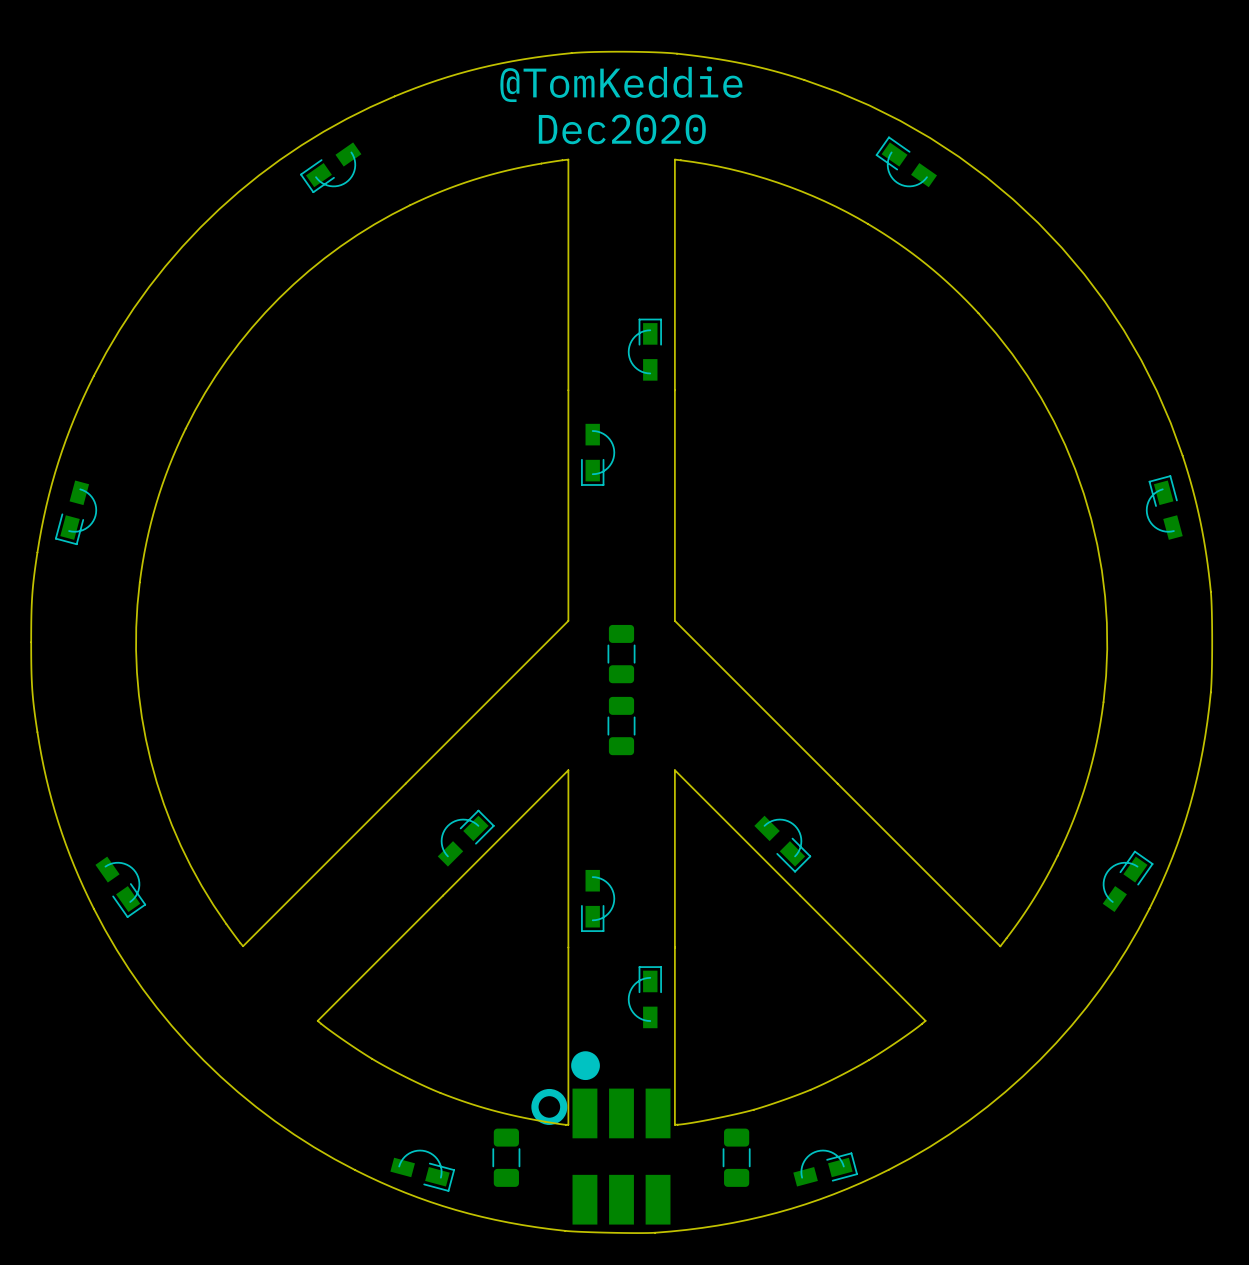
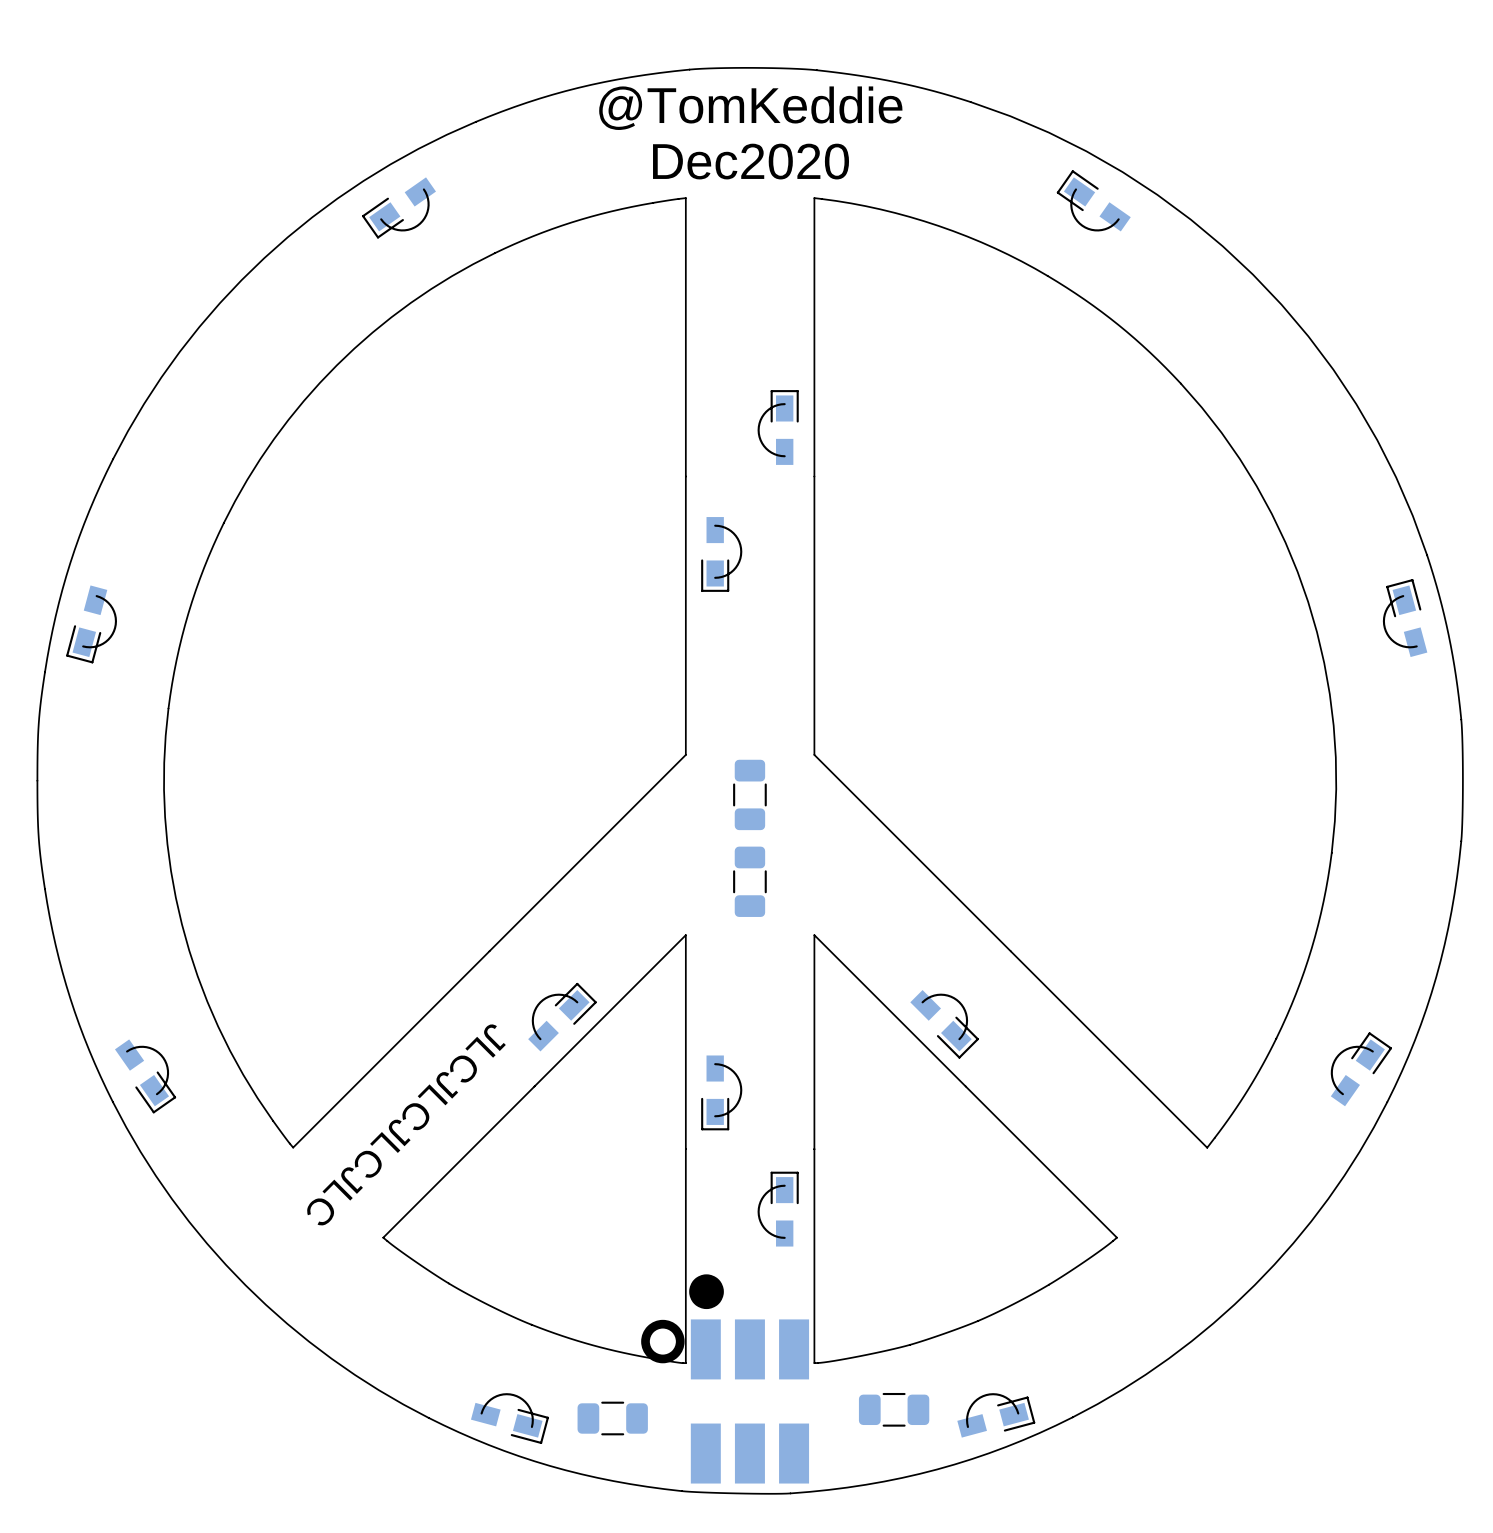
text: none -> JLCJLCJLCJLC (406, 1124)
part rotation: 0° (506, 1157) -> 90° clockwise (612, 1418)
part rotation: 0° (736, 1157) -> 90° clockwise (894, 1409)

